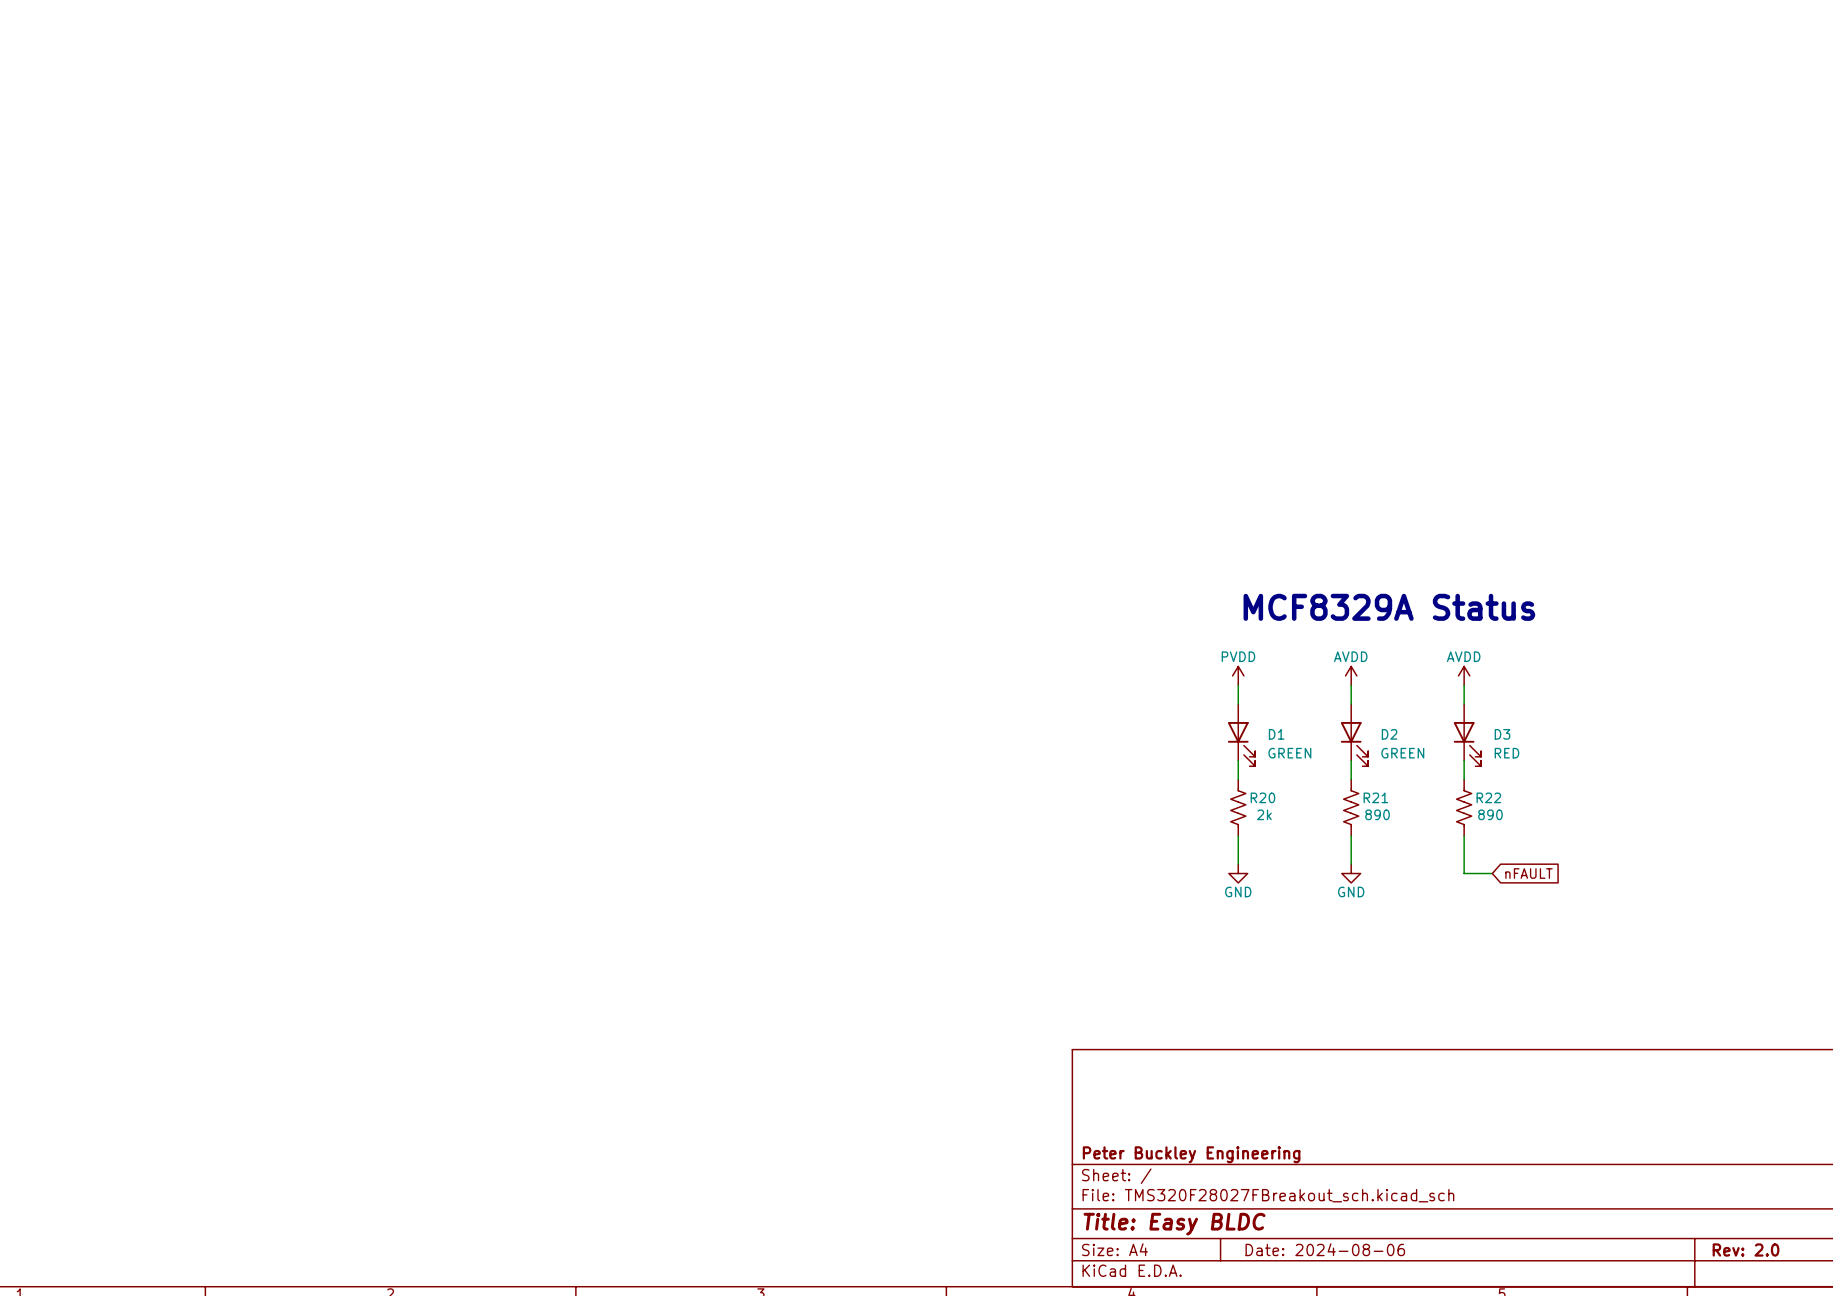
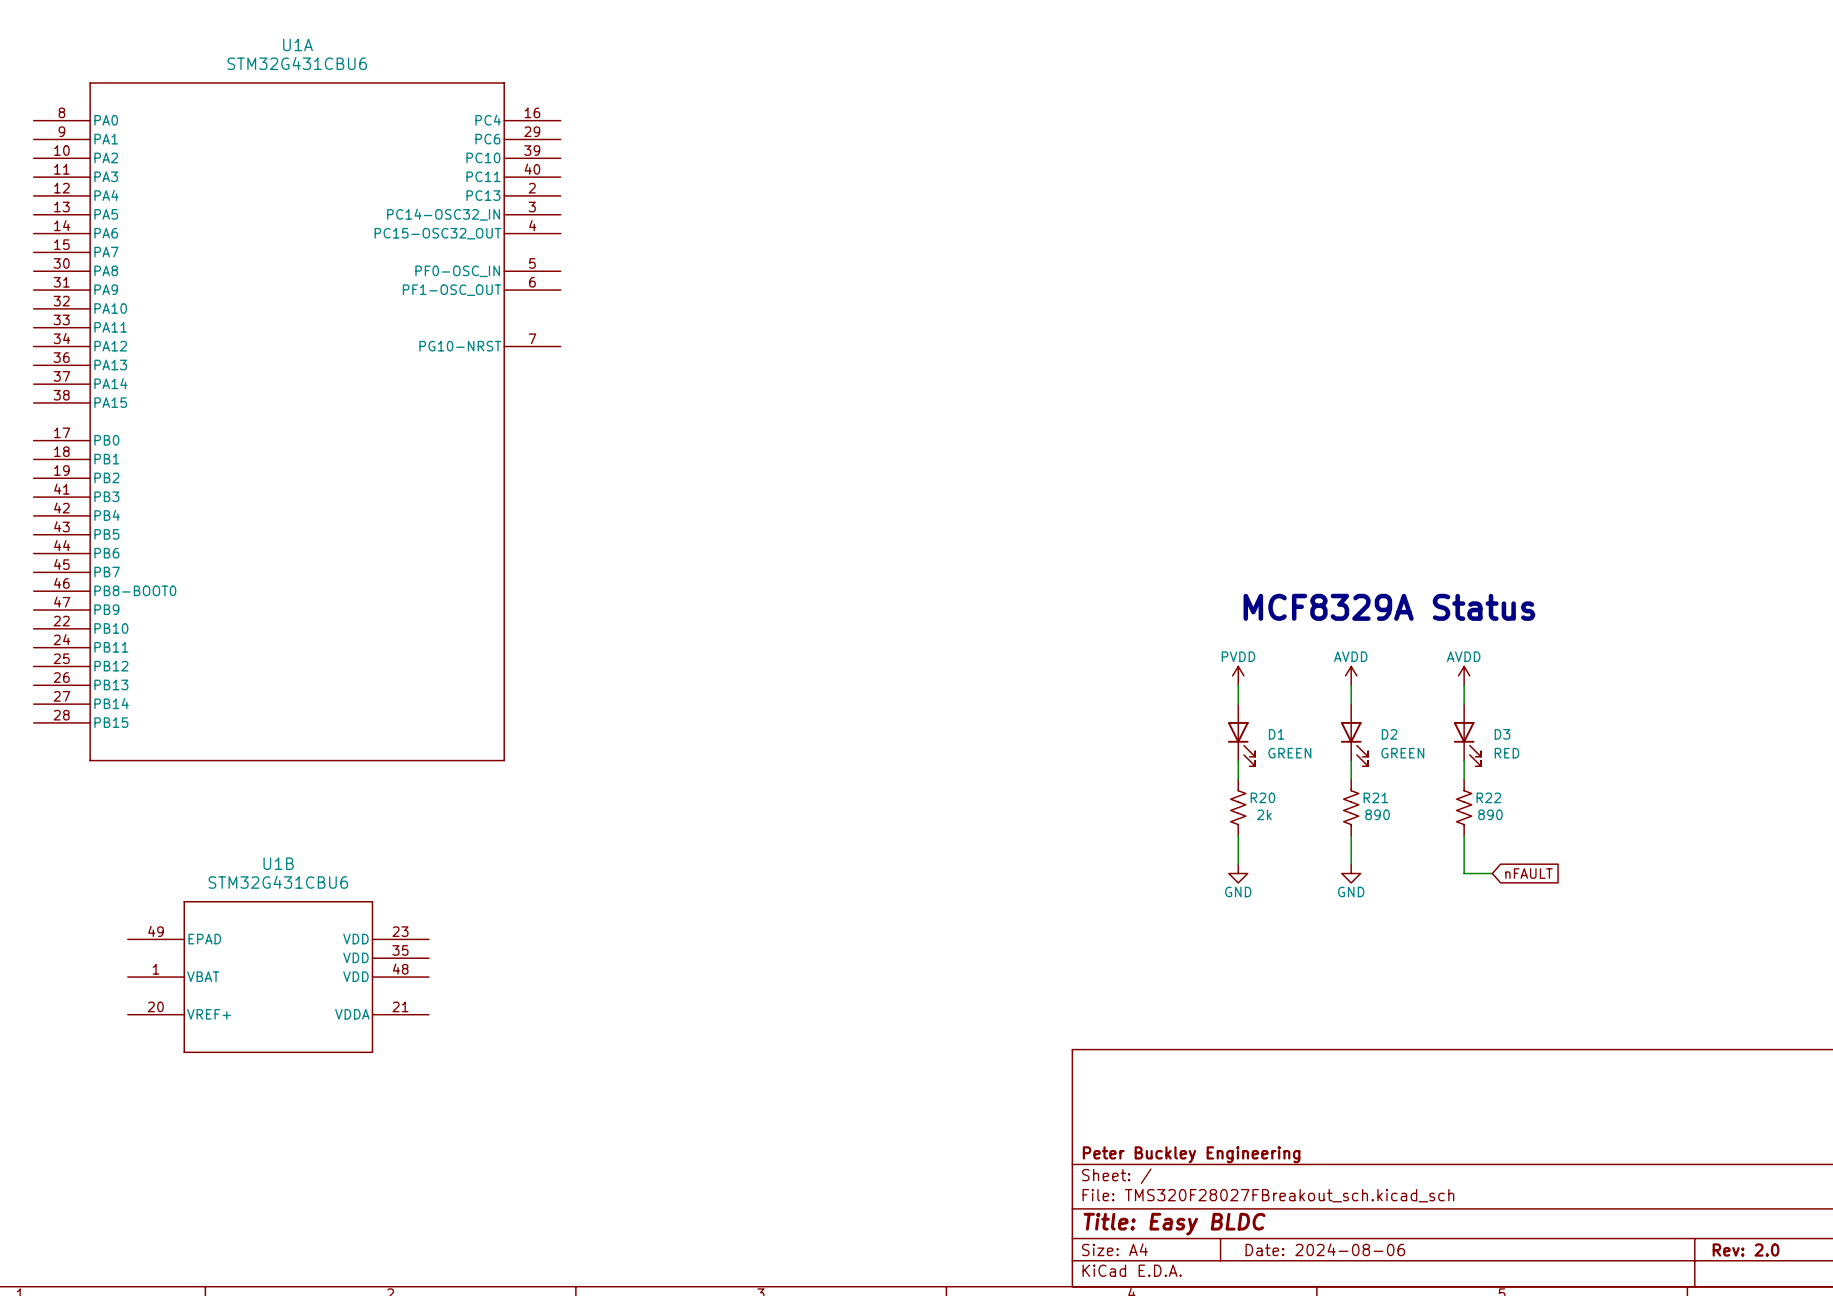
U1A: none -> STM32G431CBU6 (297, 421)
U1B: none -> STM32G431CBU6 (278, 977)

